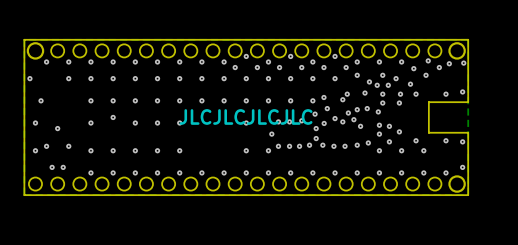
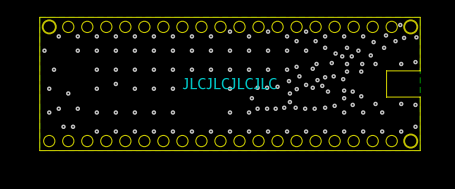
via: none -> (400, 24)
via: (235, 67) -> none
via: (257, 67) -> none
via: (279, 67) -> none
via: (301, 67) -> none

